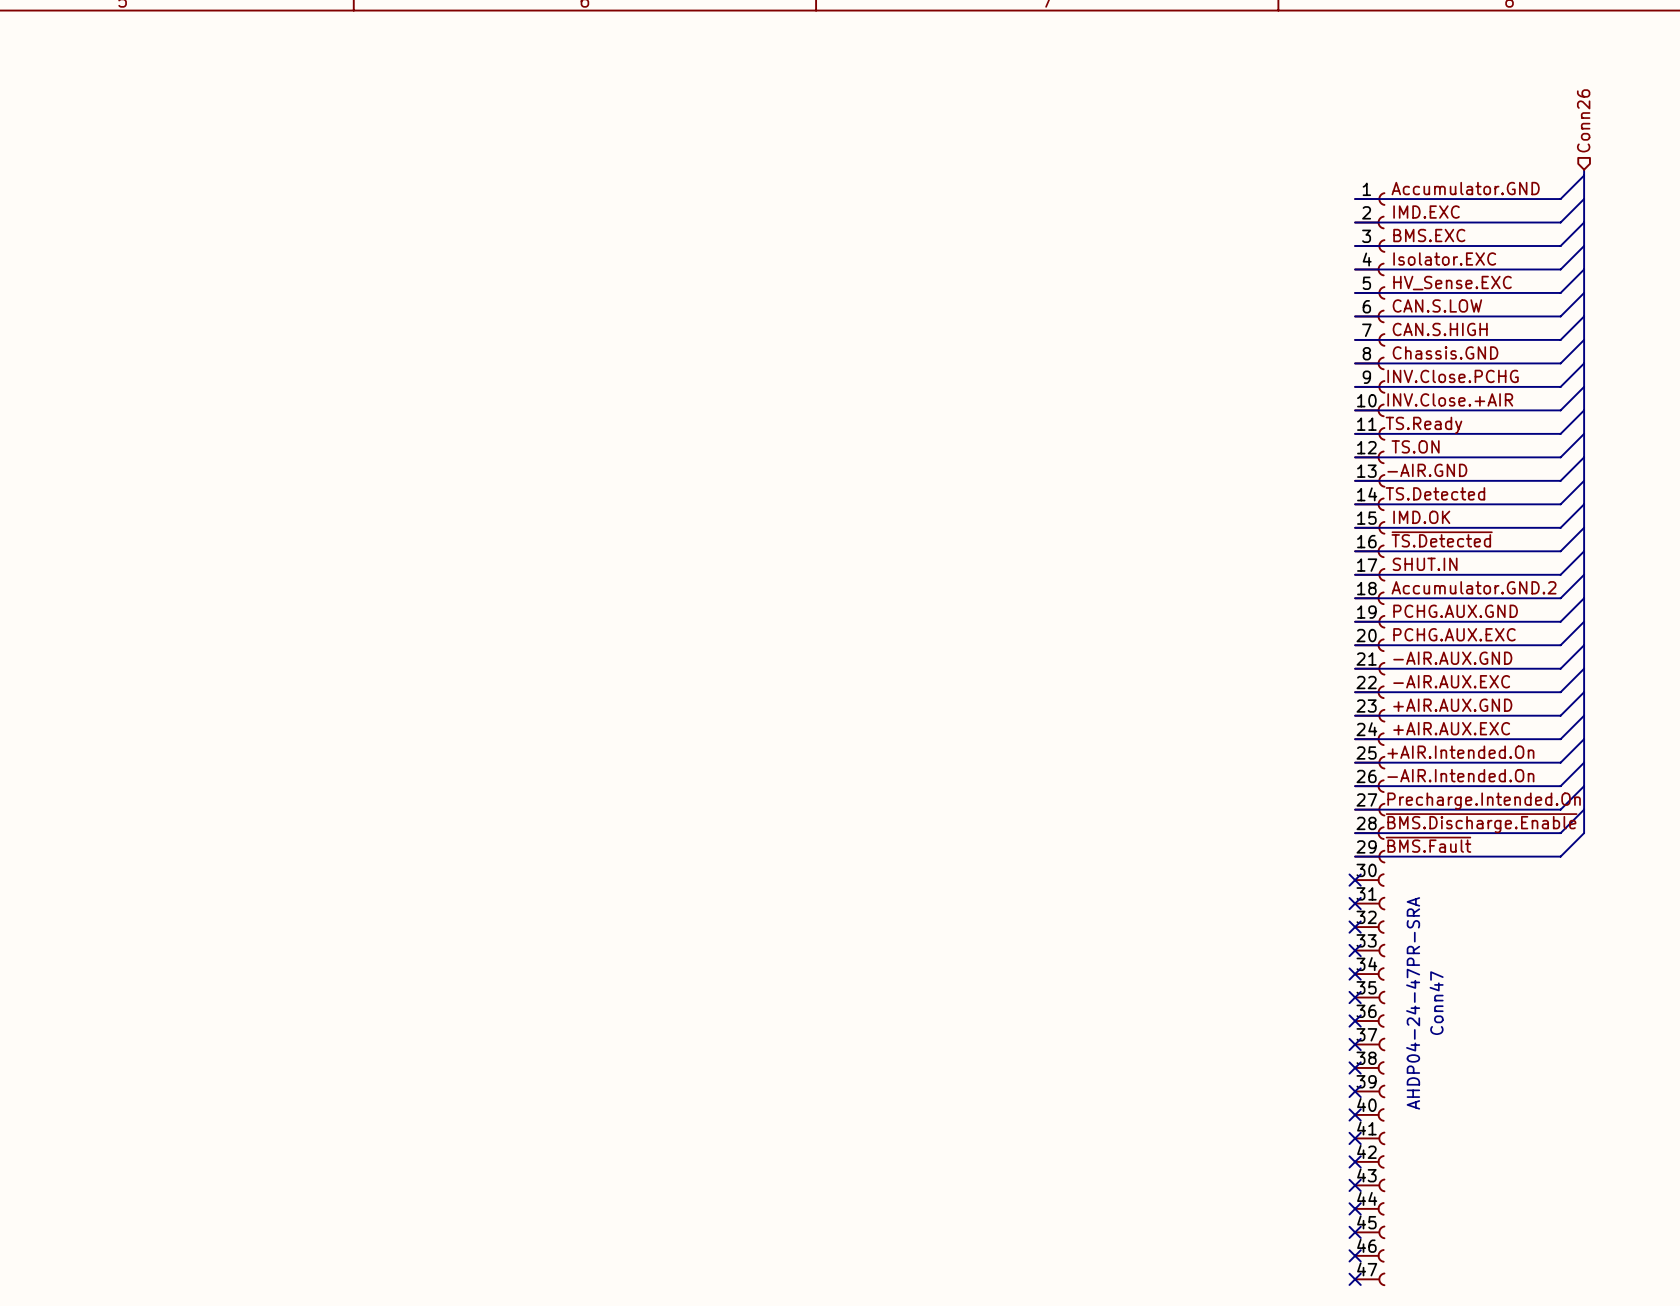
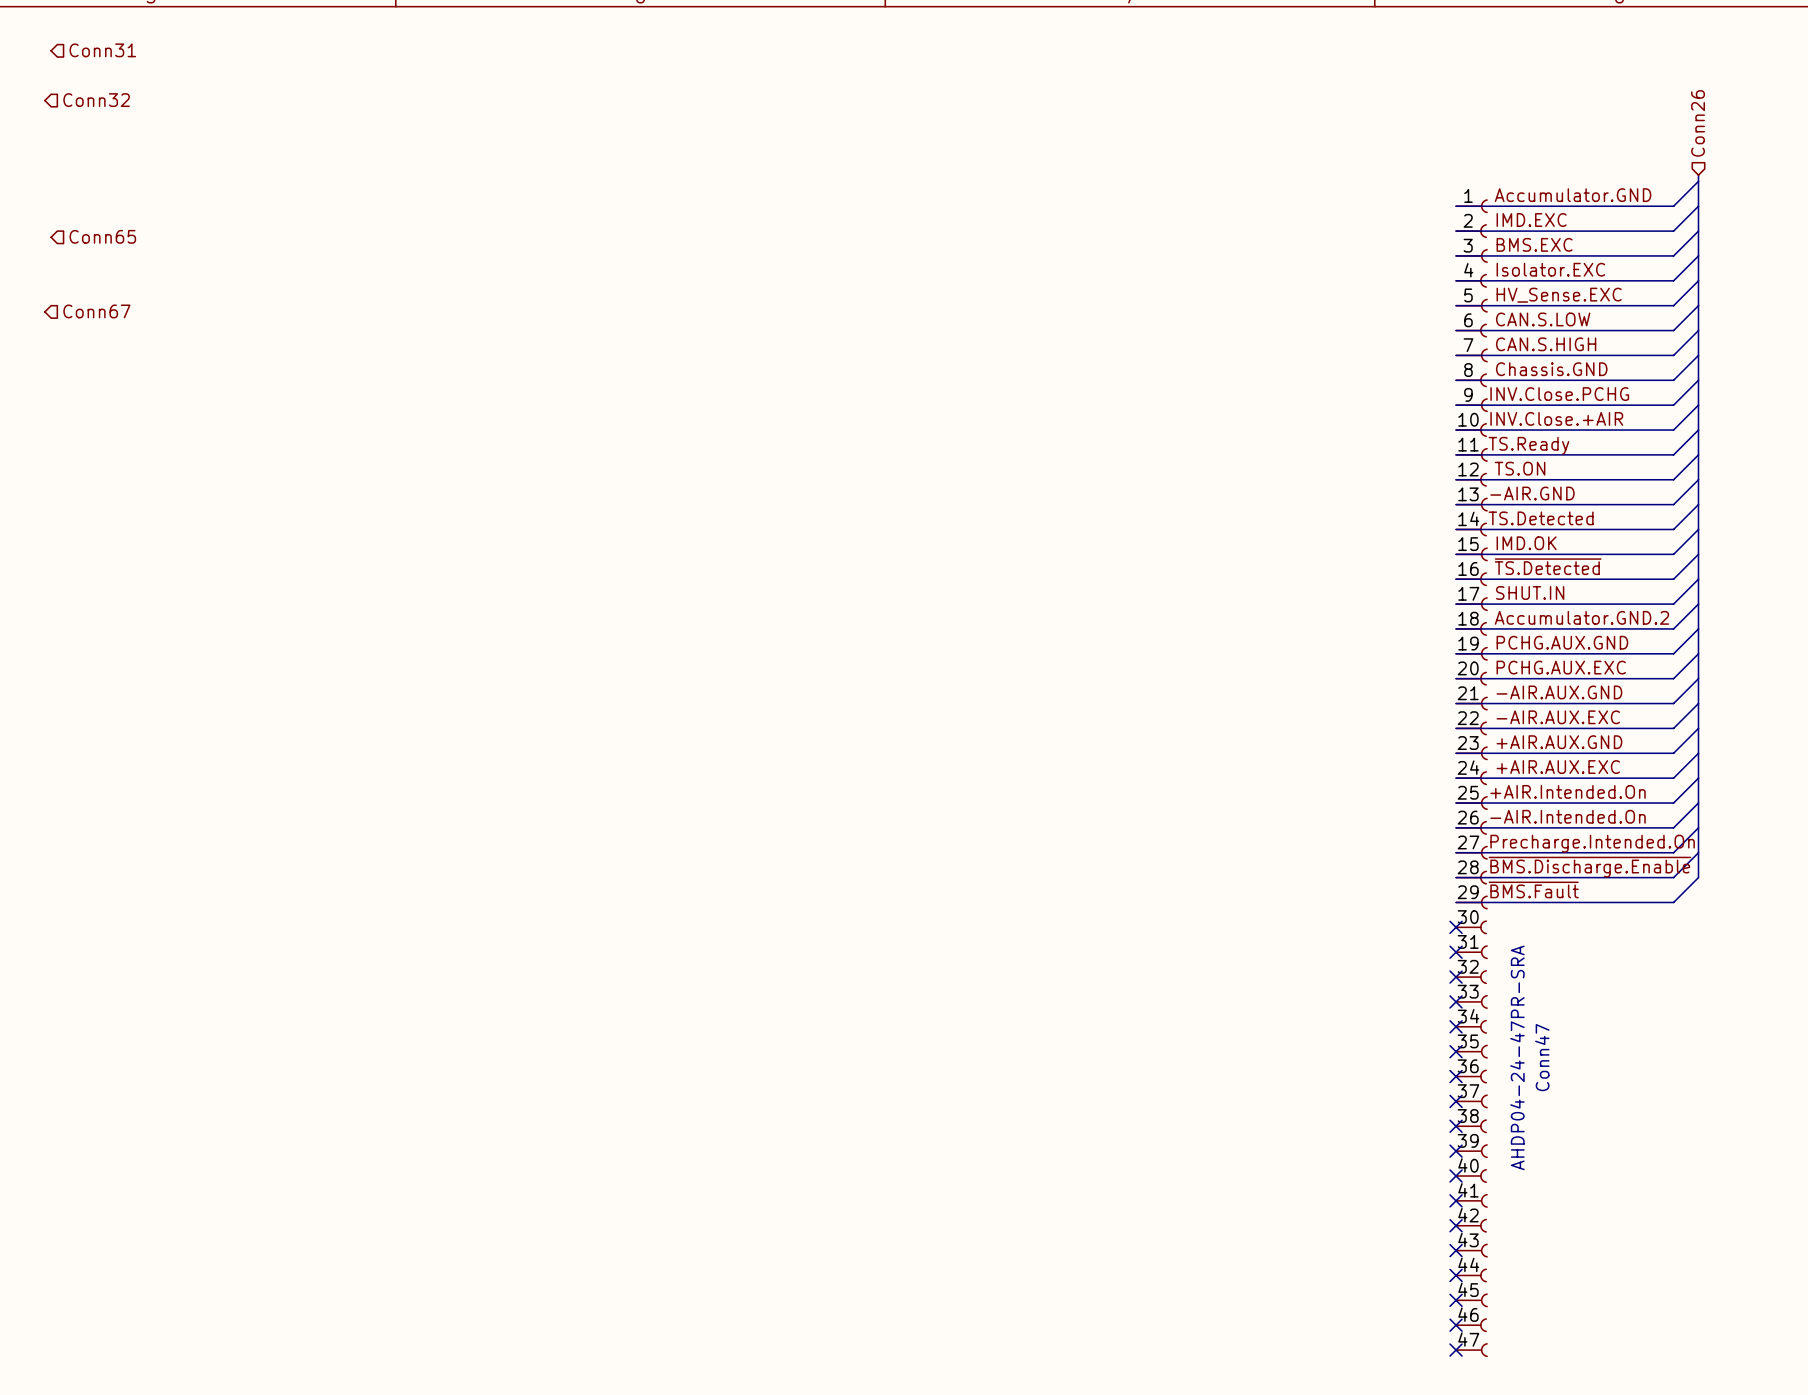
hierarchical label: none -> Conn31 (102, 50)
hierarchical label: none -> Conn32 (96, 100)
hierarchical label: none -> Conn65 (102, 236)
hierarchical label: none -> Conn67 (96, 311)

